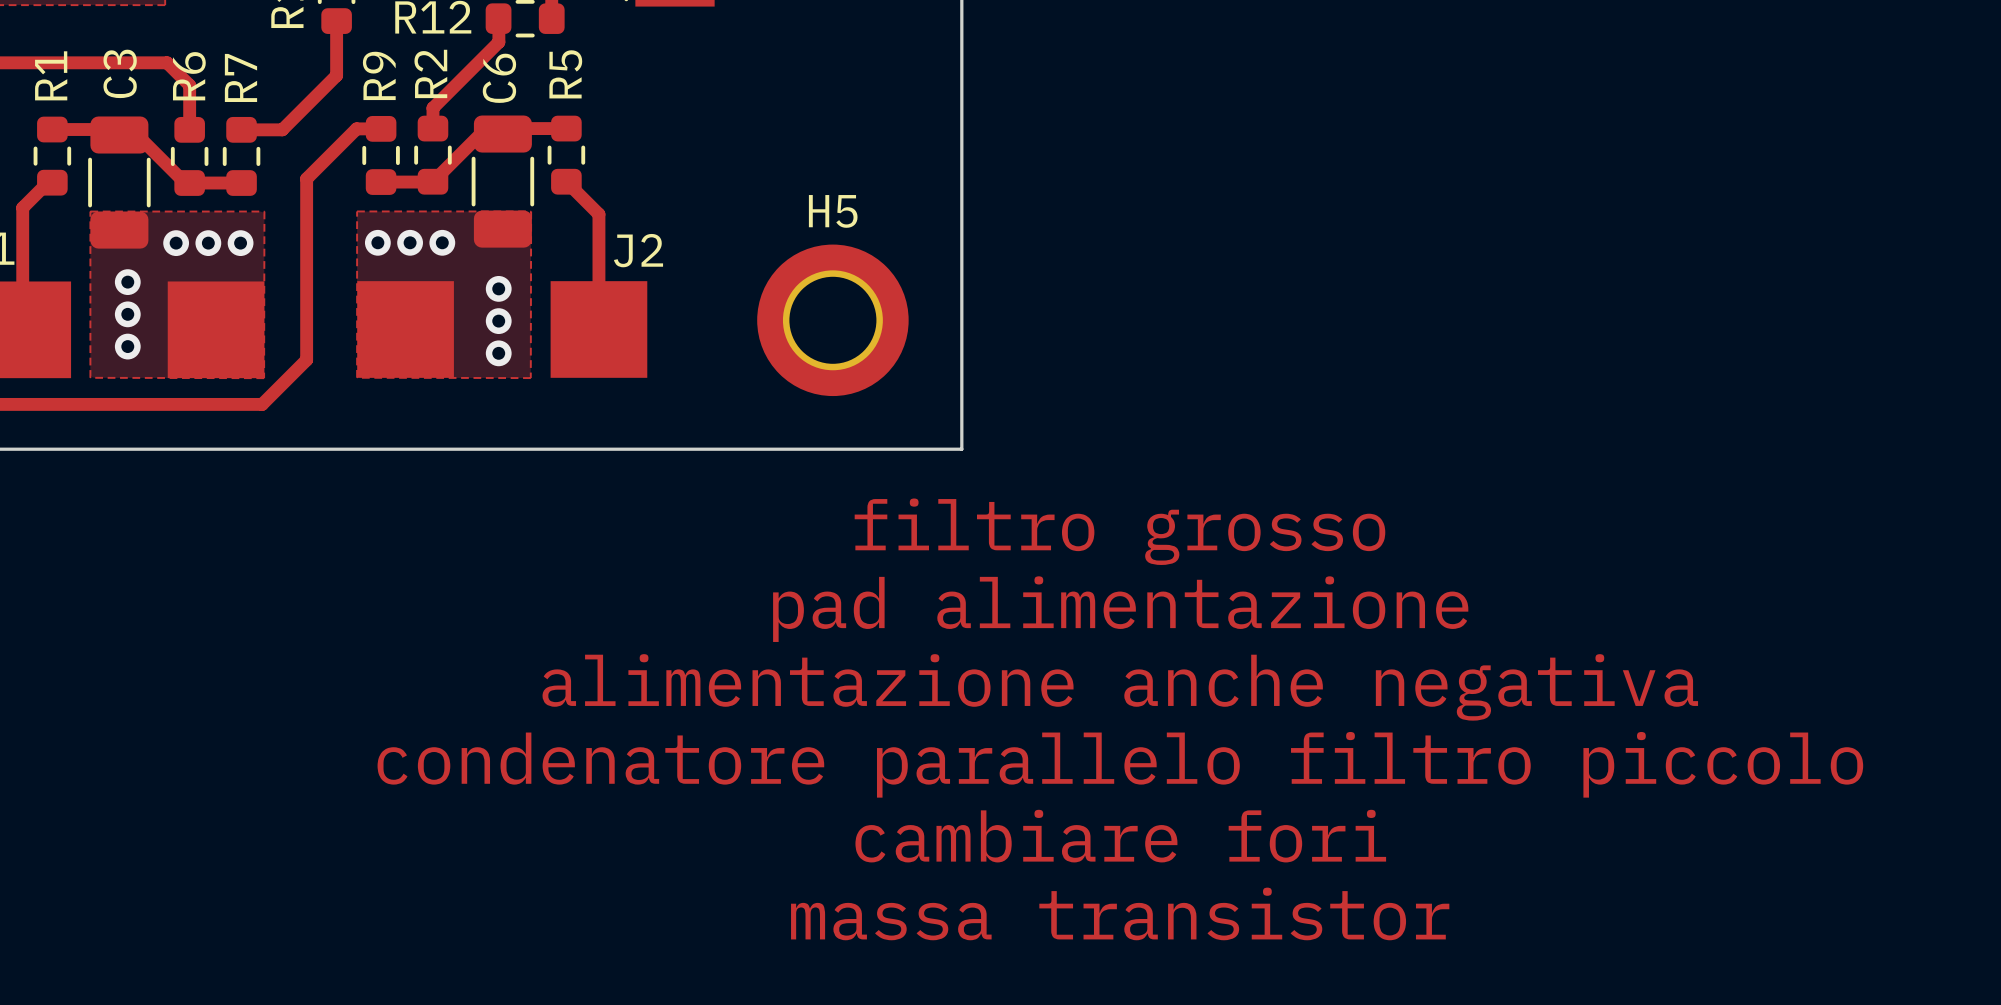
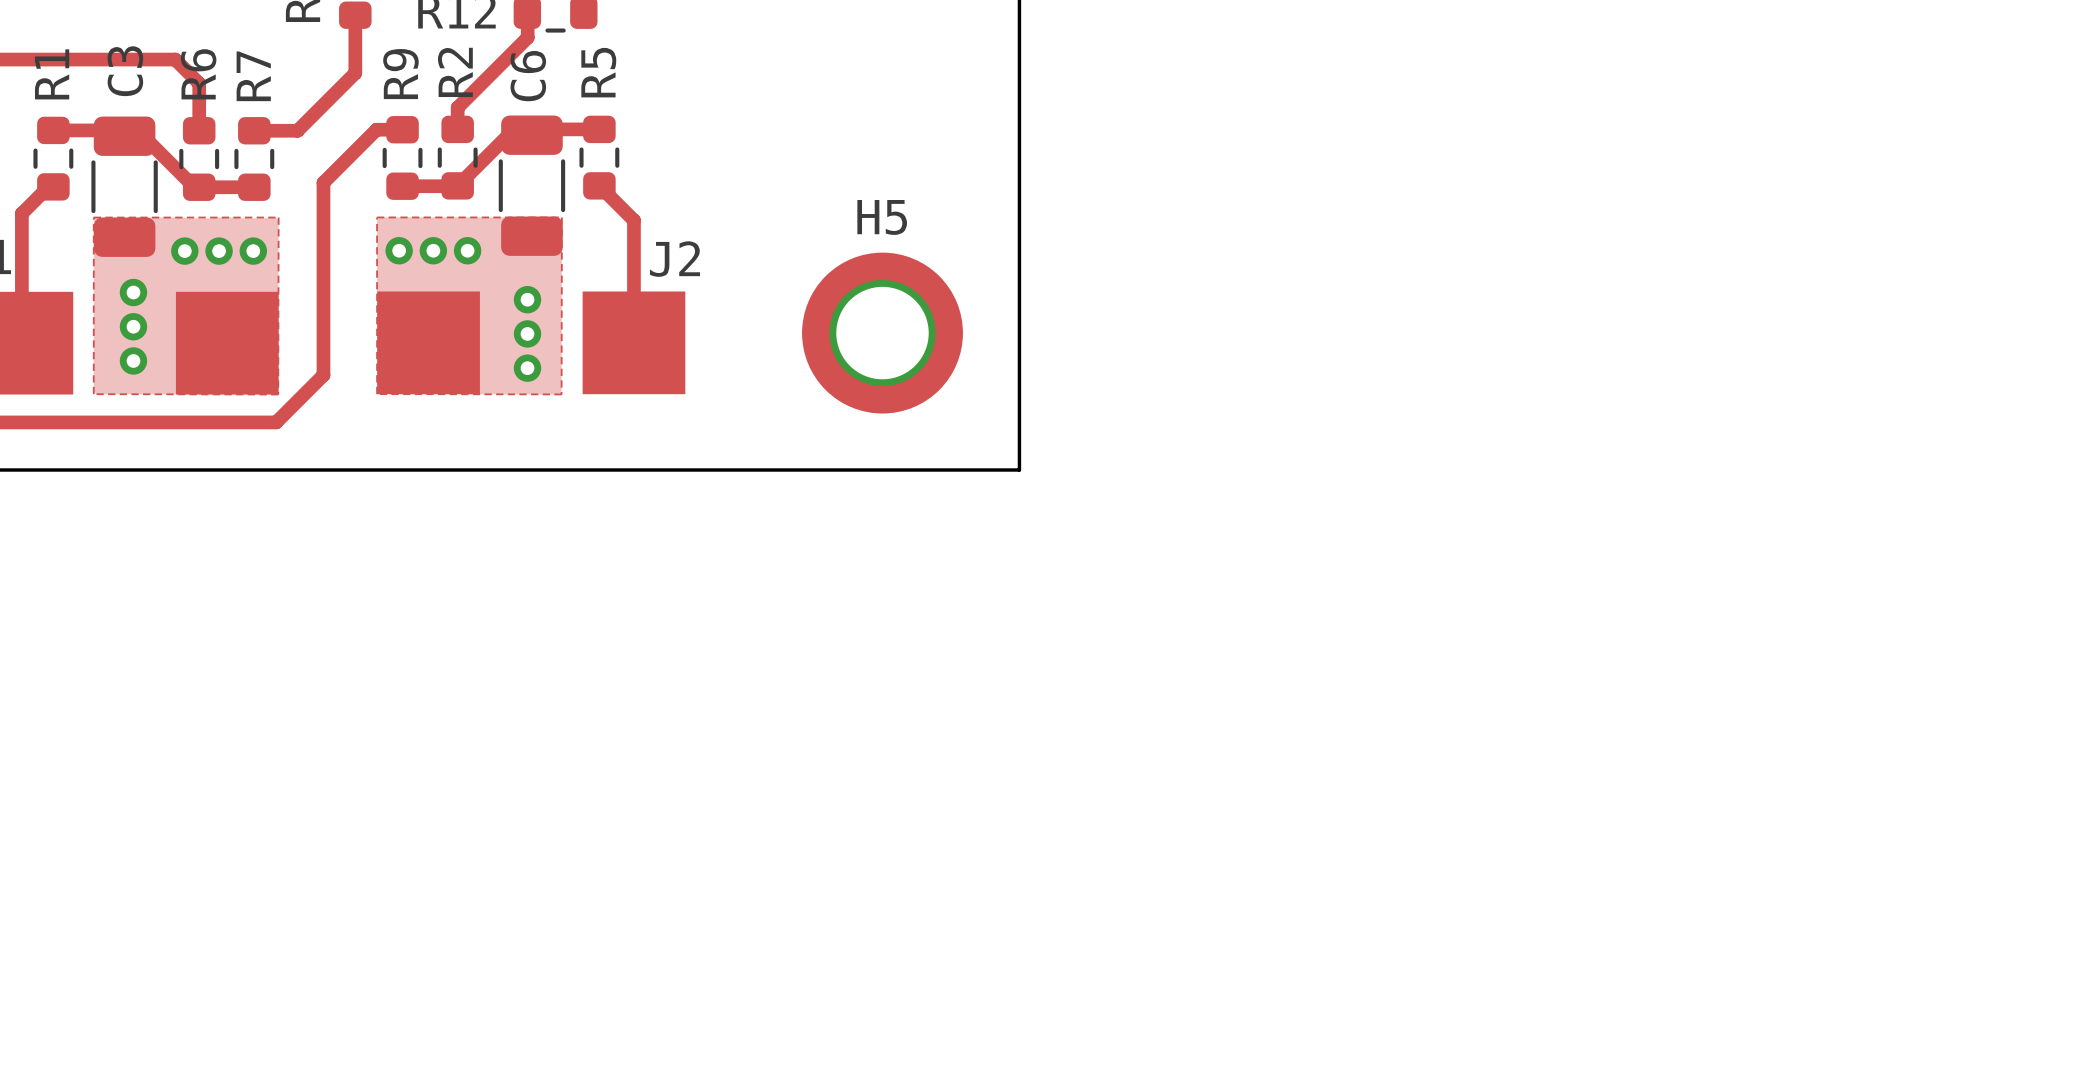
text: filtro grosso (1119, 531) -> none
text: pad alimentazione (1120, 609) -> none
text: alimentazione anche negativa (1120, 687) -> none
text: condenatore parallelo filtro piccolo (1120, 764) -> none
text: cambiare fori (1120, 836) -> none
text: massa transistor (1120, 913) -> none

